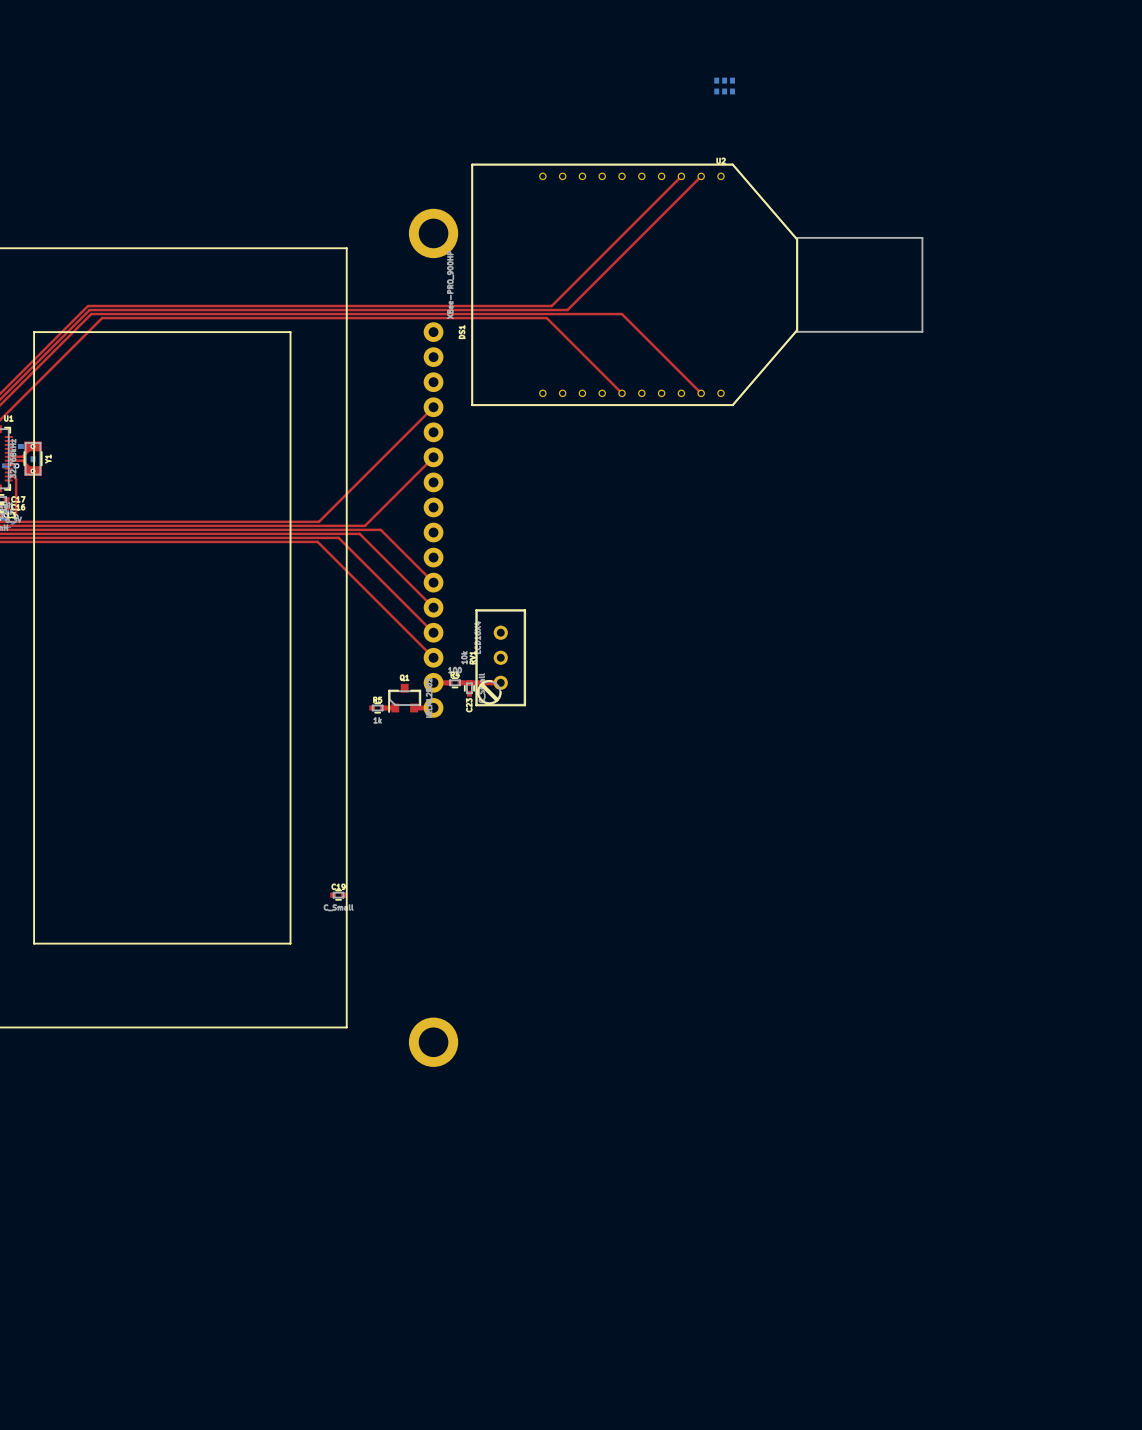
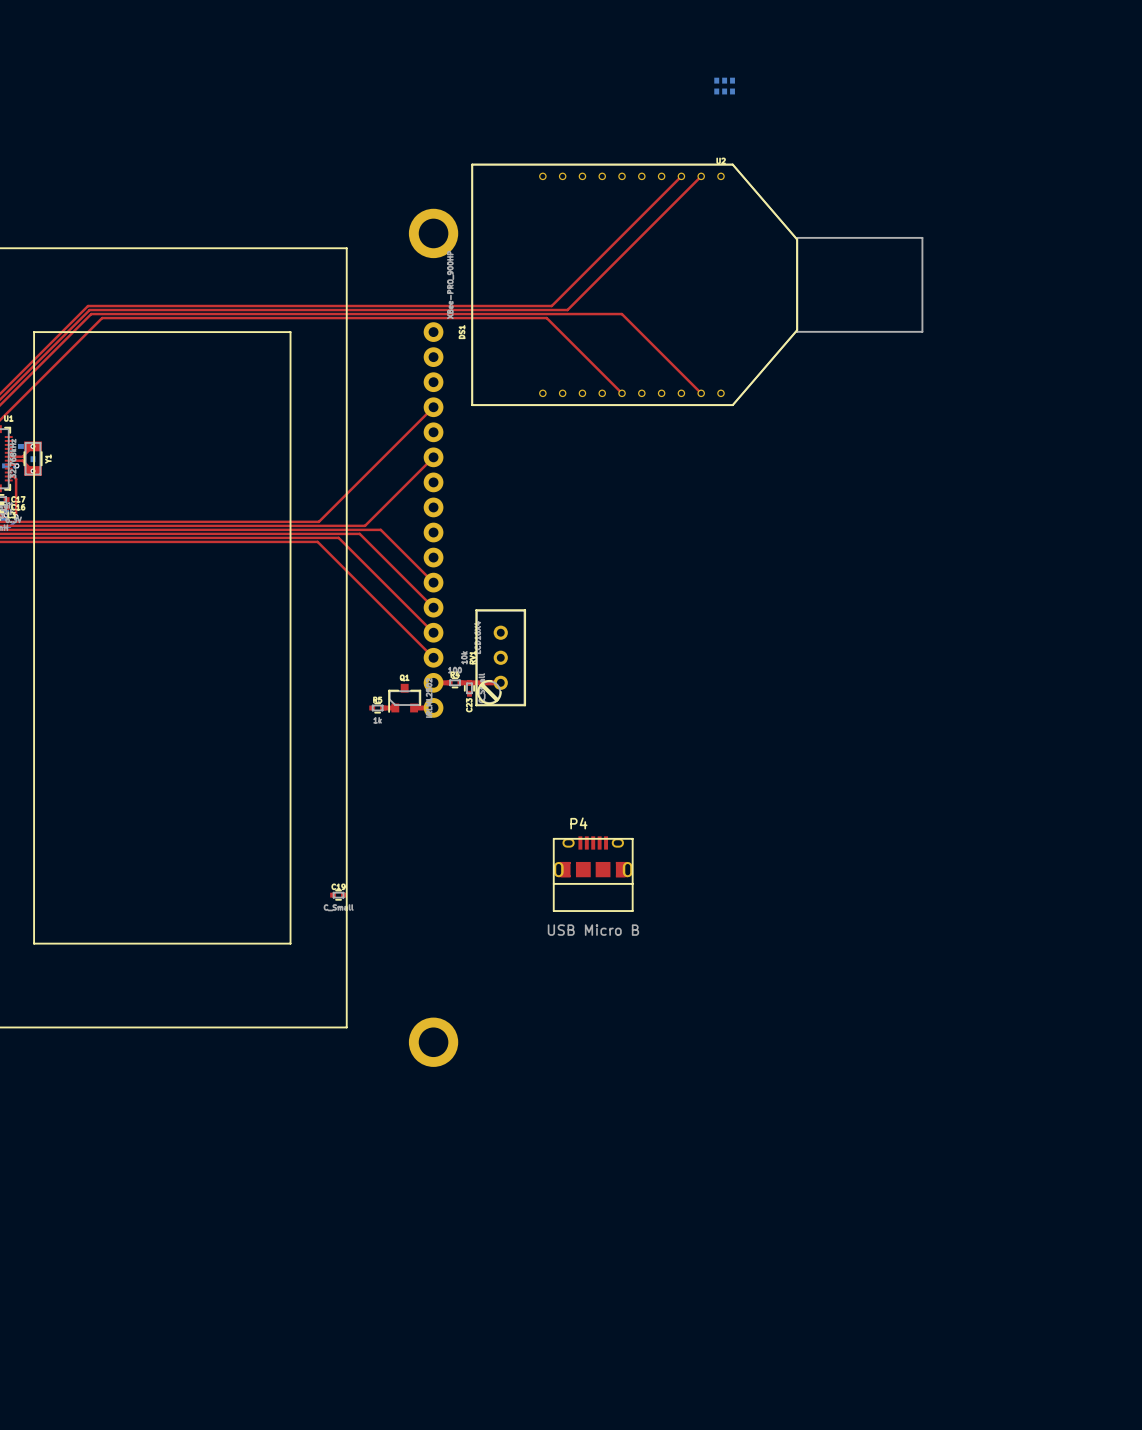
P4: none -> USB Micro B (593, 873)

